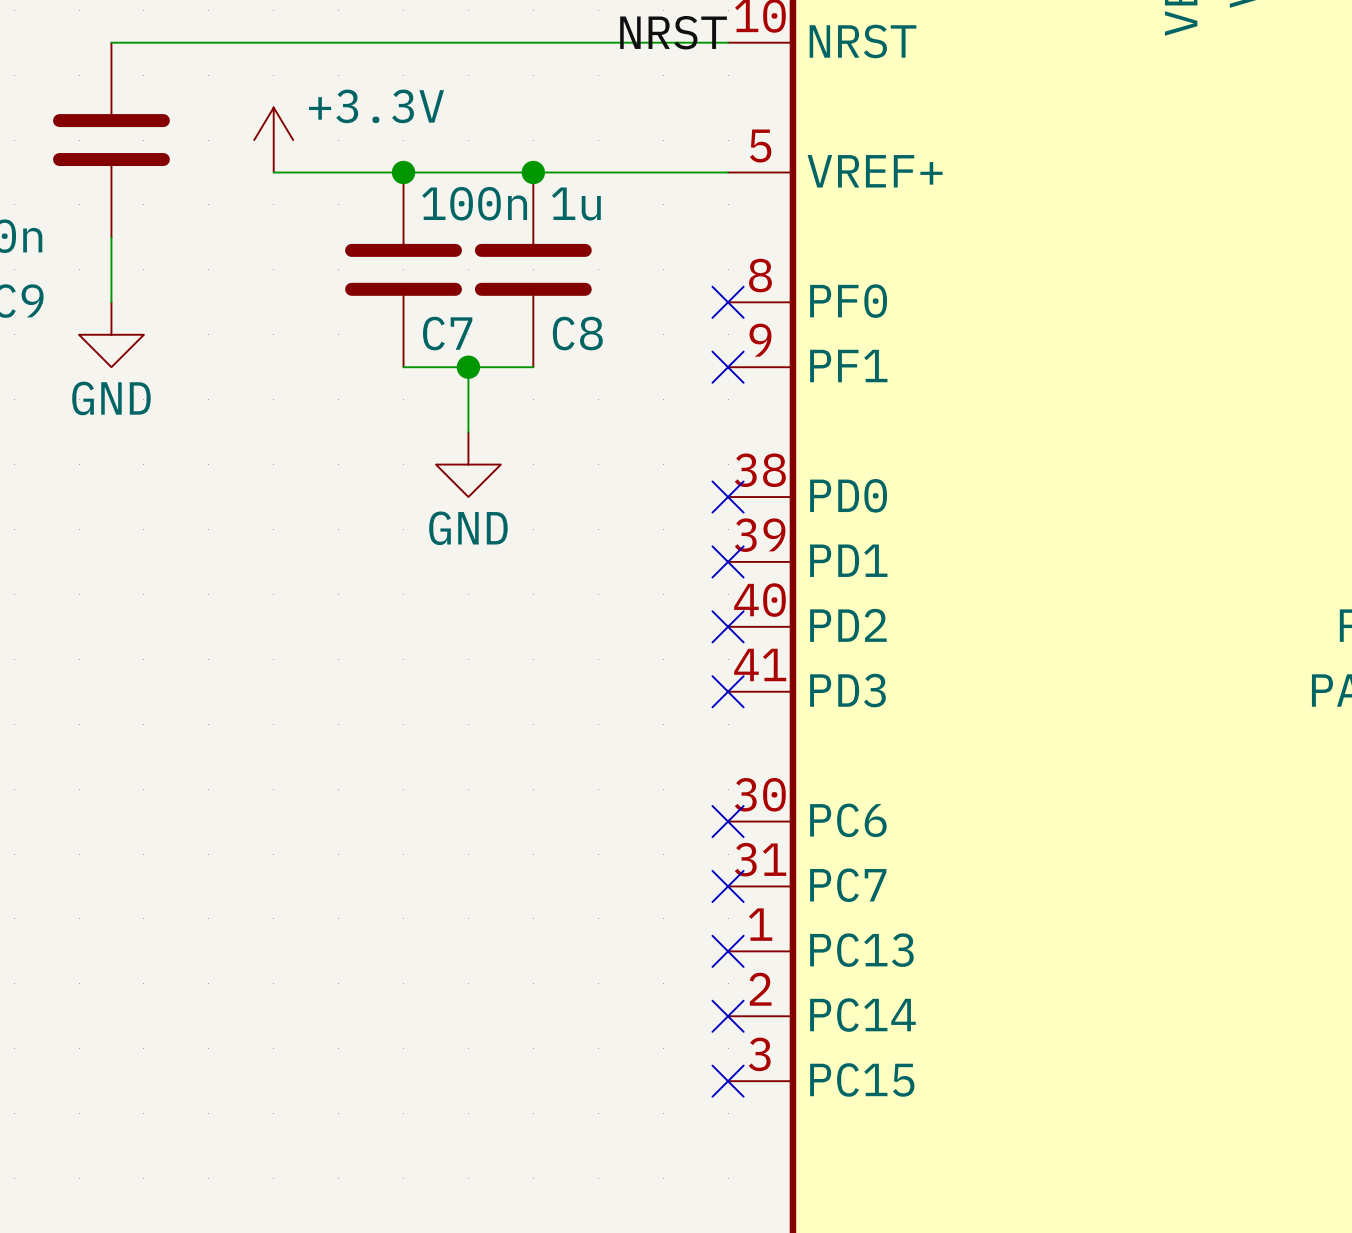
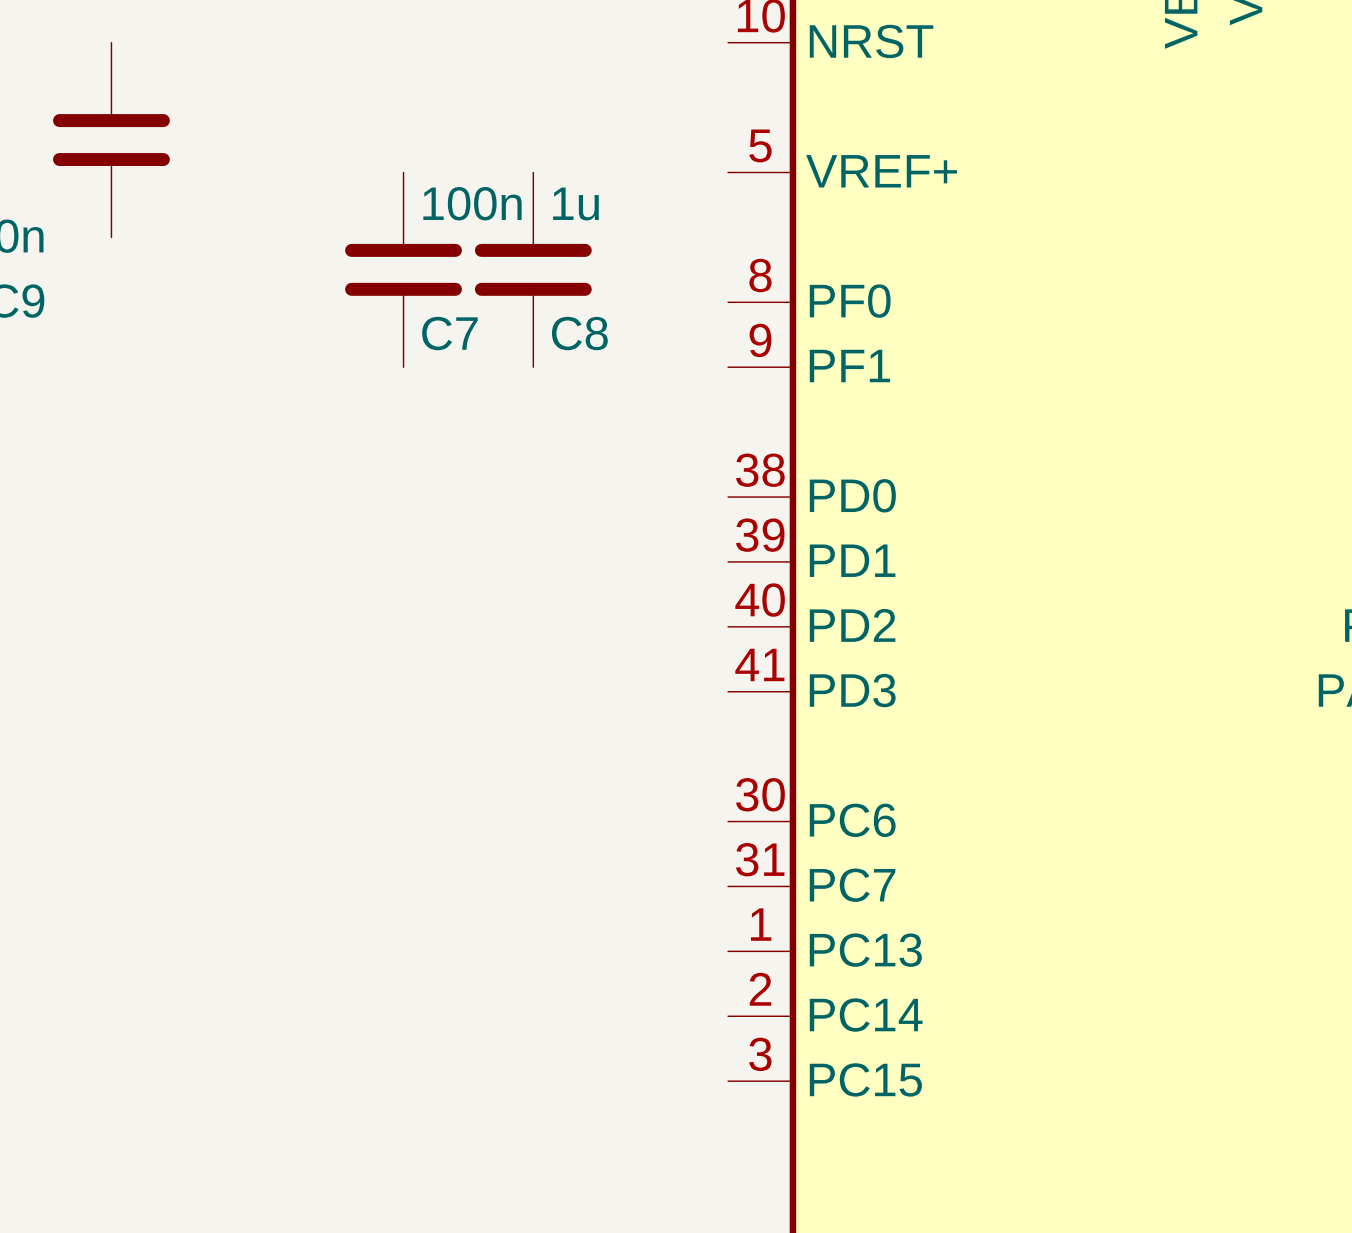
label: NRST (673, 32) -> none
wire: (111, 42) (728, 42) -> none
power symbol: +3.3V (273, 140) -> none
wire: (273, 172) (728, 172) -> none
junction: (403, 172) -> none
junction: (533, 172) -> none
wire: (111, 237) (111, 302) -> none
no-connect mark: (728, 302) -> none
power symbol: GND (111, 334) -> none
wire: (403, 367) (533, 367) -> none
wire: (468, 367) (468, 432) -> none
junction: (468, 367) -> none
no-connect mark: (728, 367) -> none
power symbol: GND (468, 464) -> none
no-connect mark: (728, 497) -> none
no-connect mark: (728, 561) -> none
no-connect mark: (728, 626) -> none
no-connect mark: (728, 691) -> none
no-connect mark: (728, 821) -> none
no-connect mark: (728, 886) -> none
no-connect mark: (728, 951) -> none
no-connect mark: (728, 1016) -> none
no-connect mark: (728, 1081) -> none

